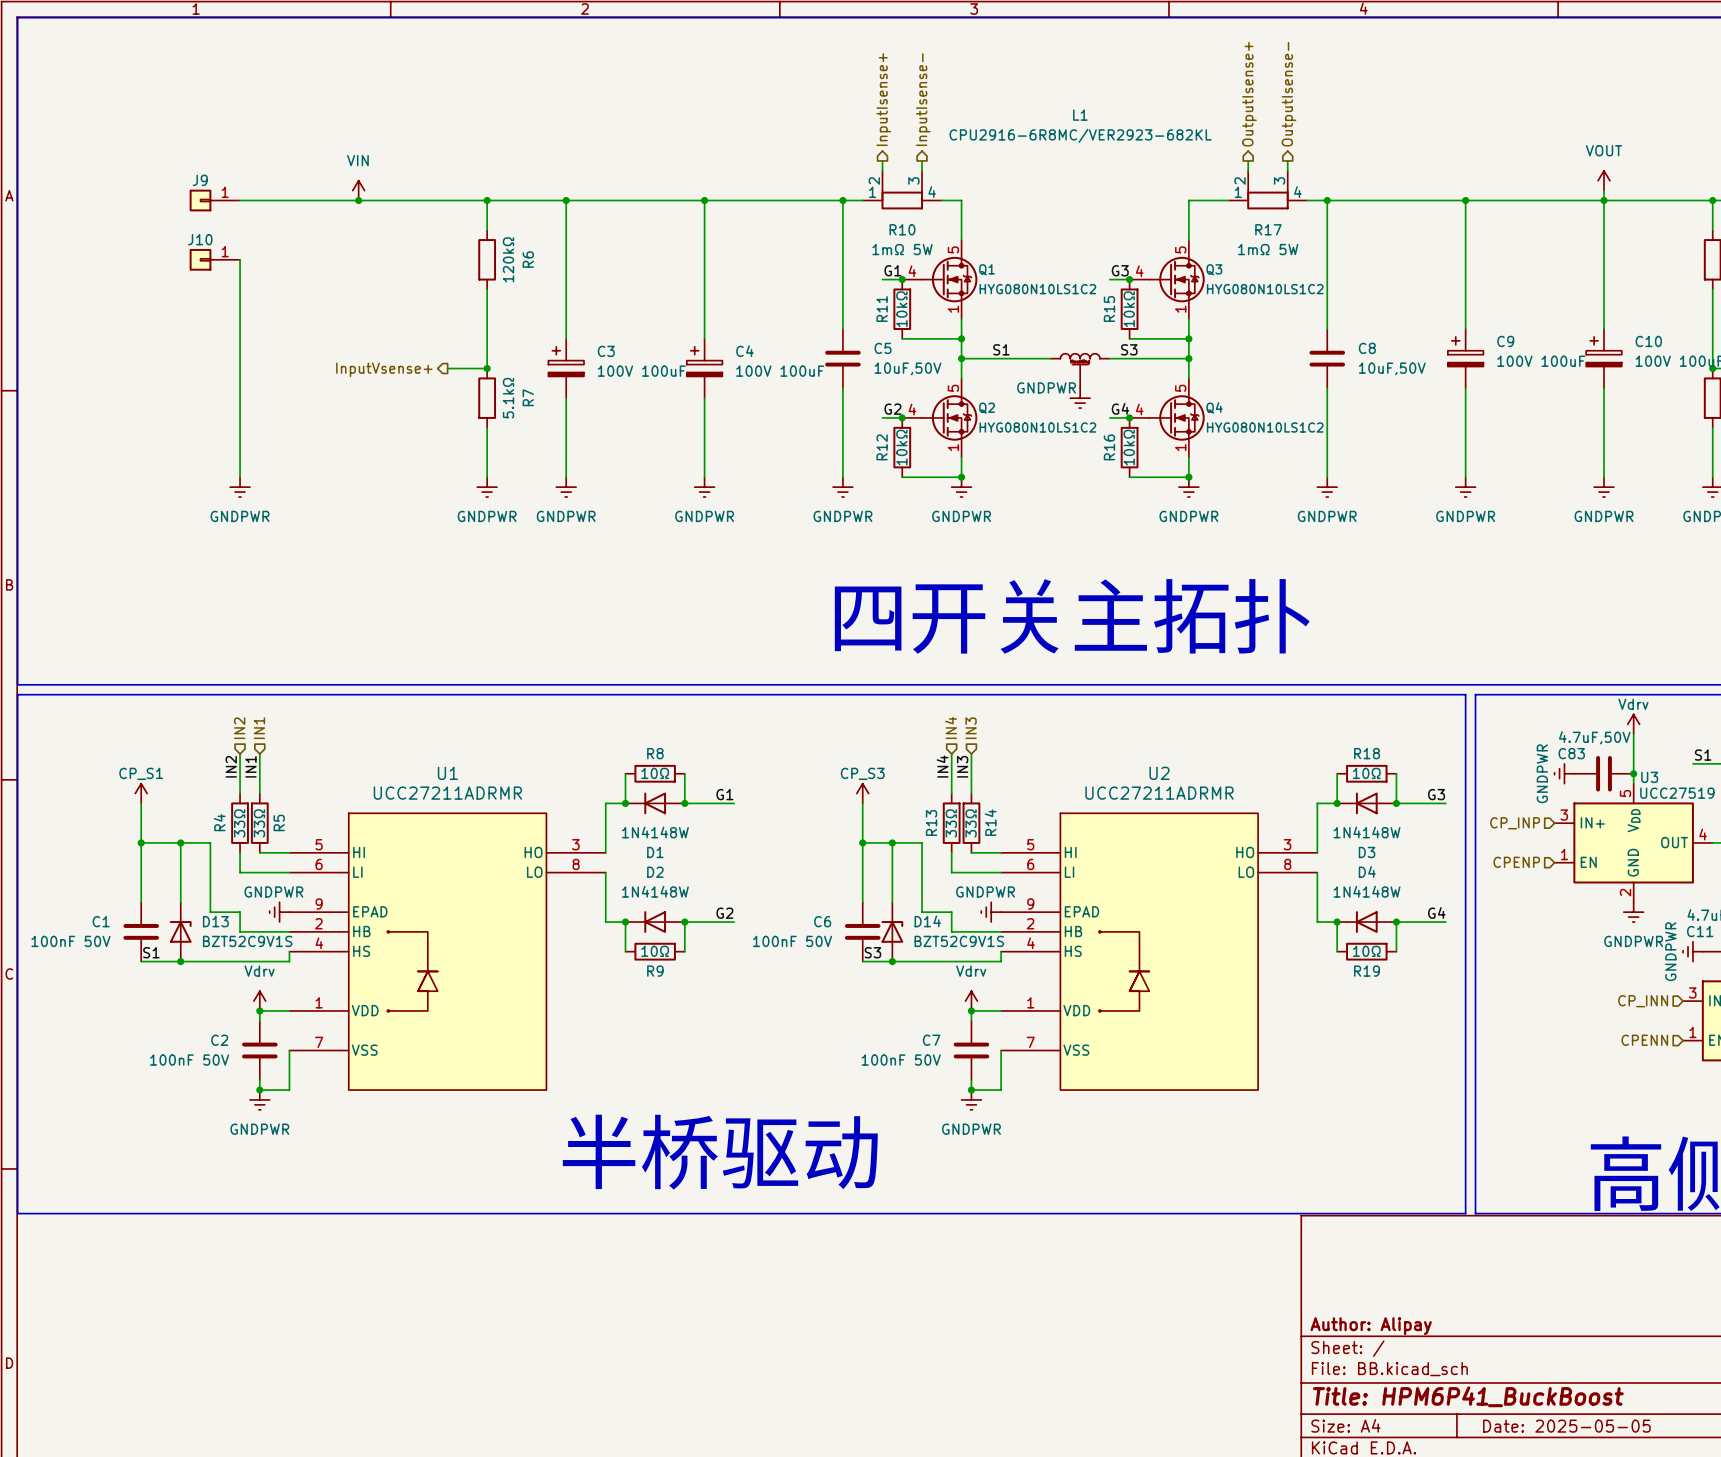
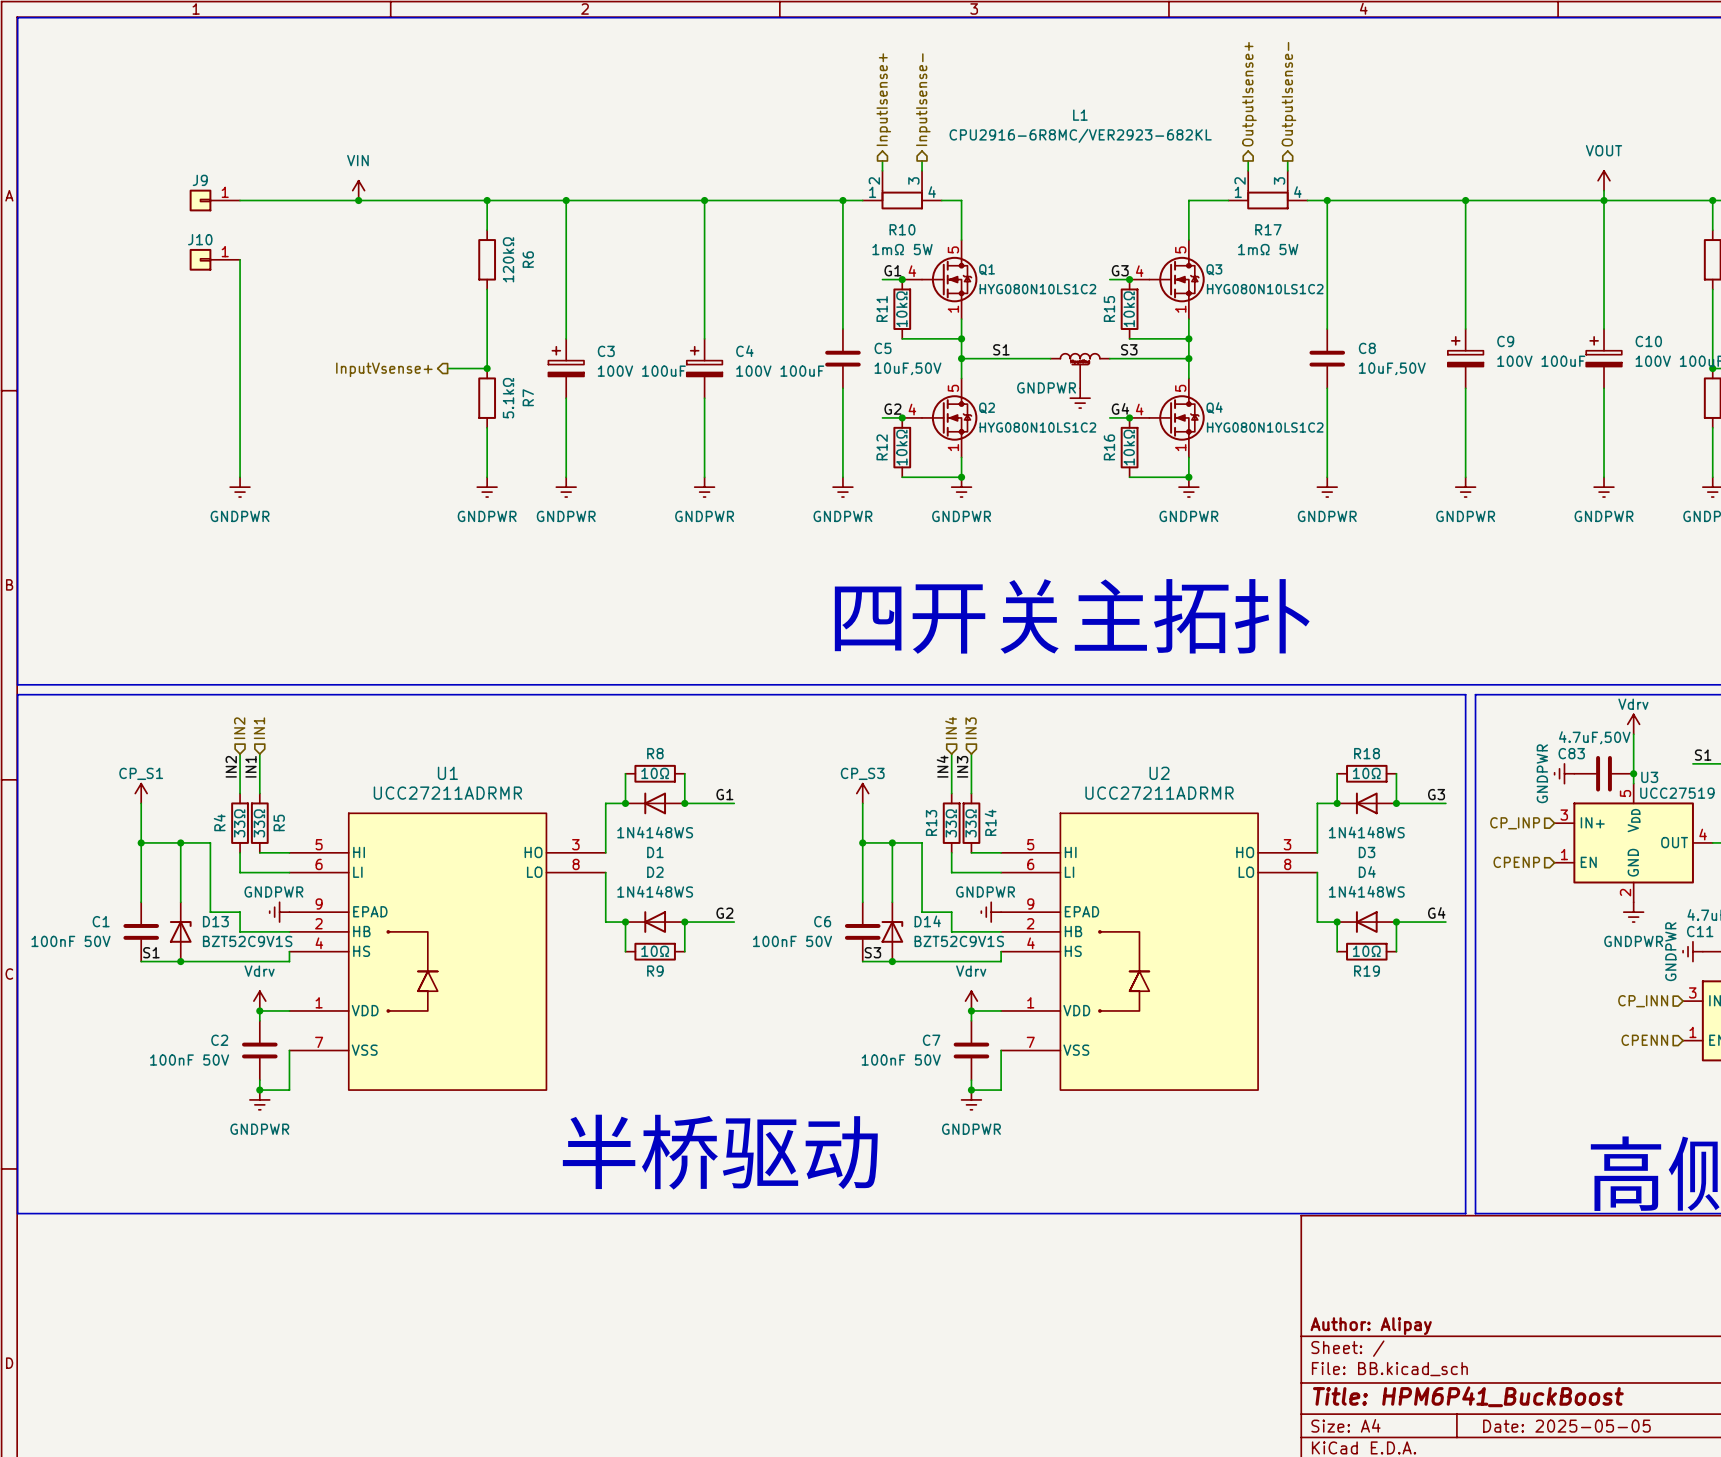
D1 value: 1N4148W (655, 832) -> 1N4148WS (655, 832)
D3 value: 1N4148W (1367, 832) -> 1N4148WS (1366, 832)
D2 value: 1N4148W (655, 891) -> 1N4148WS (655, 891)
D4 value: 1N4148W (1367, 891) -> 1N4148WS (1366, 891)

